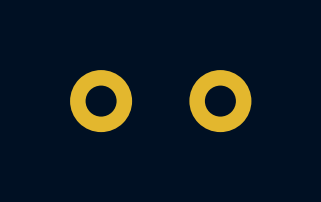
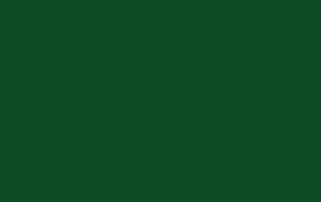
part: (160, 101) -> none

